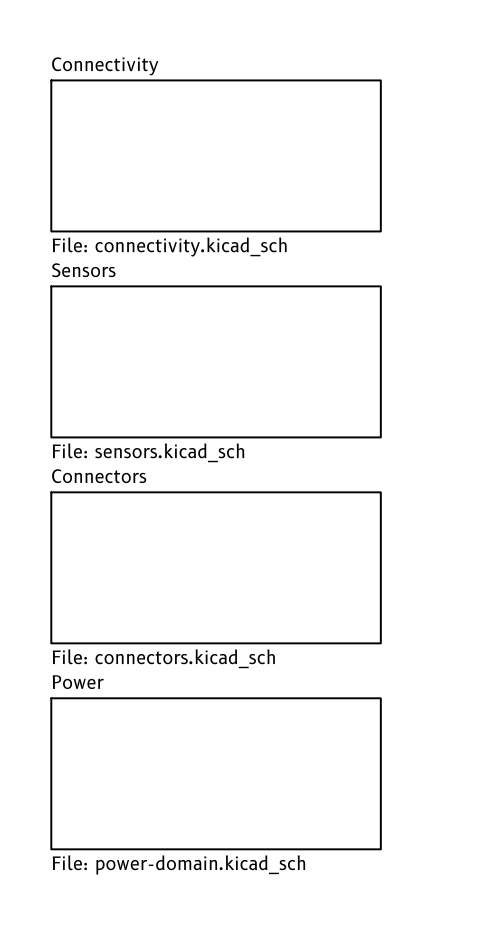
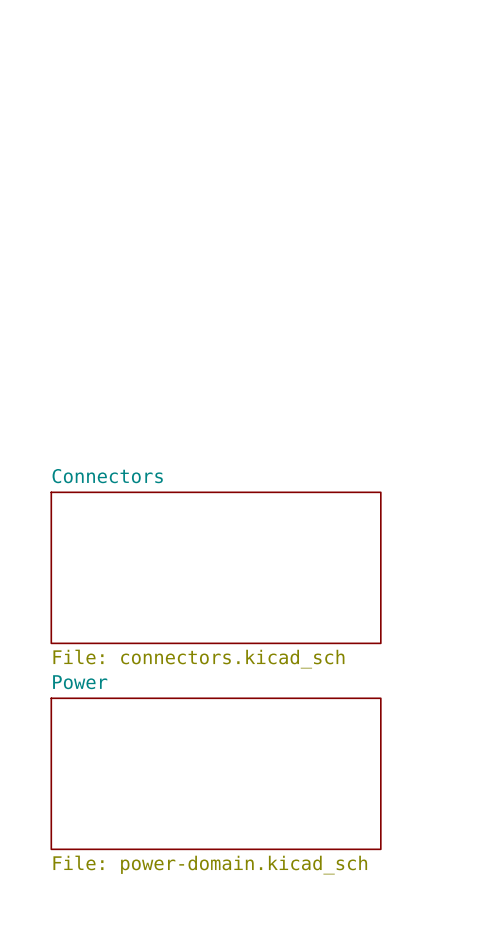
sheet Connectivity: File: connectivity.kicad_sch (216, 155) -> none
sheet Sensors: File: sensors.kicad_sch (216, 361) -> none

